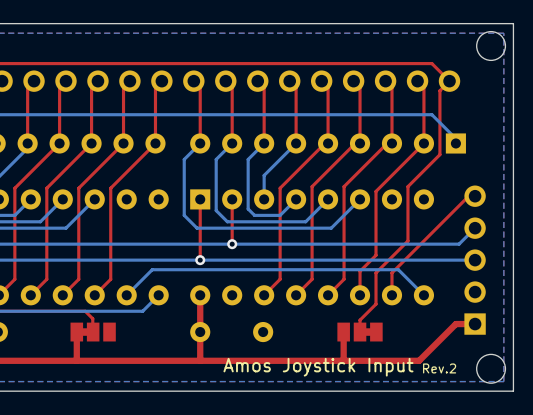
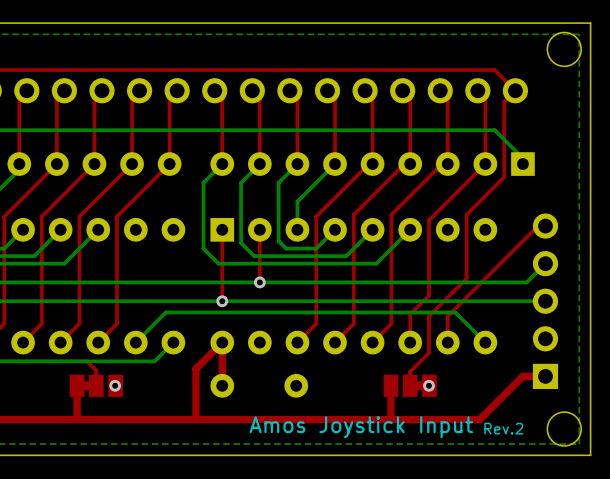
top track: none -> (222, 342) (195, 368) (195, 419)
via: none -> (115, 385)
top track: (200, 332) (200, 360) -> none
via: none -> (428, 385)

